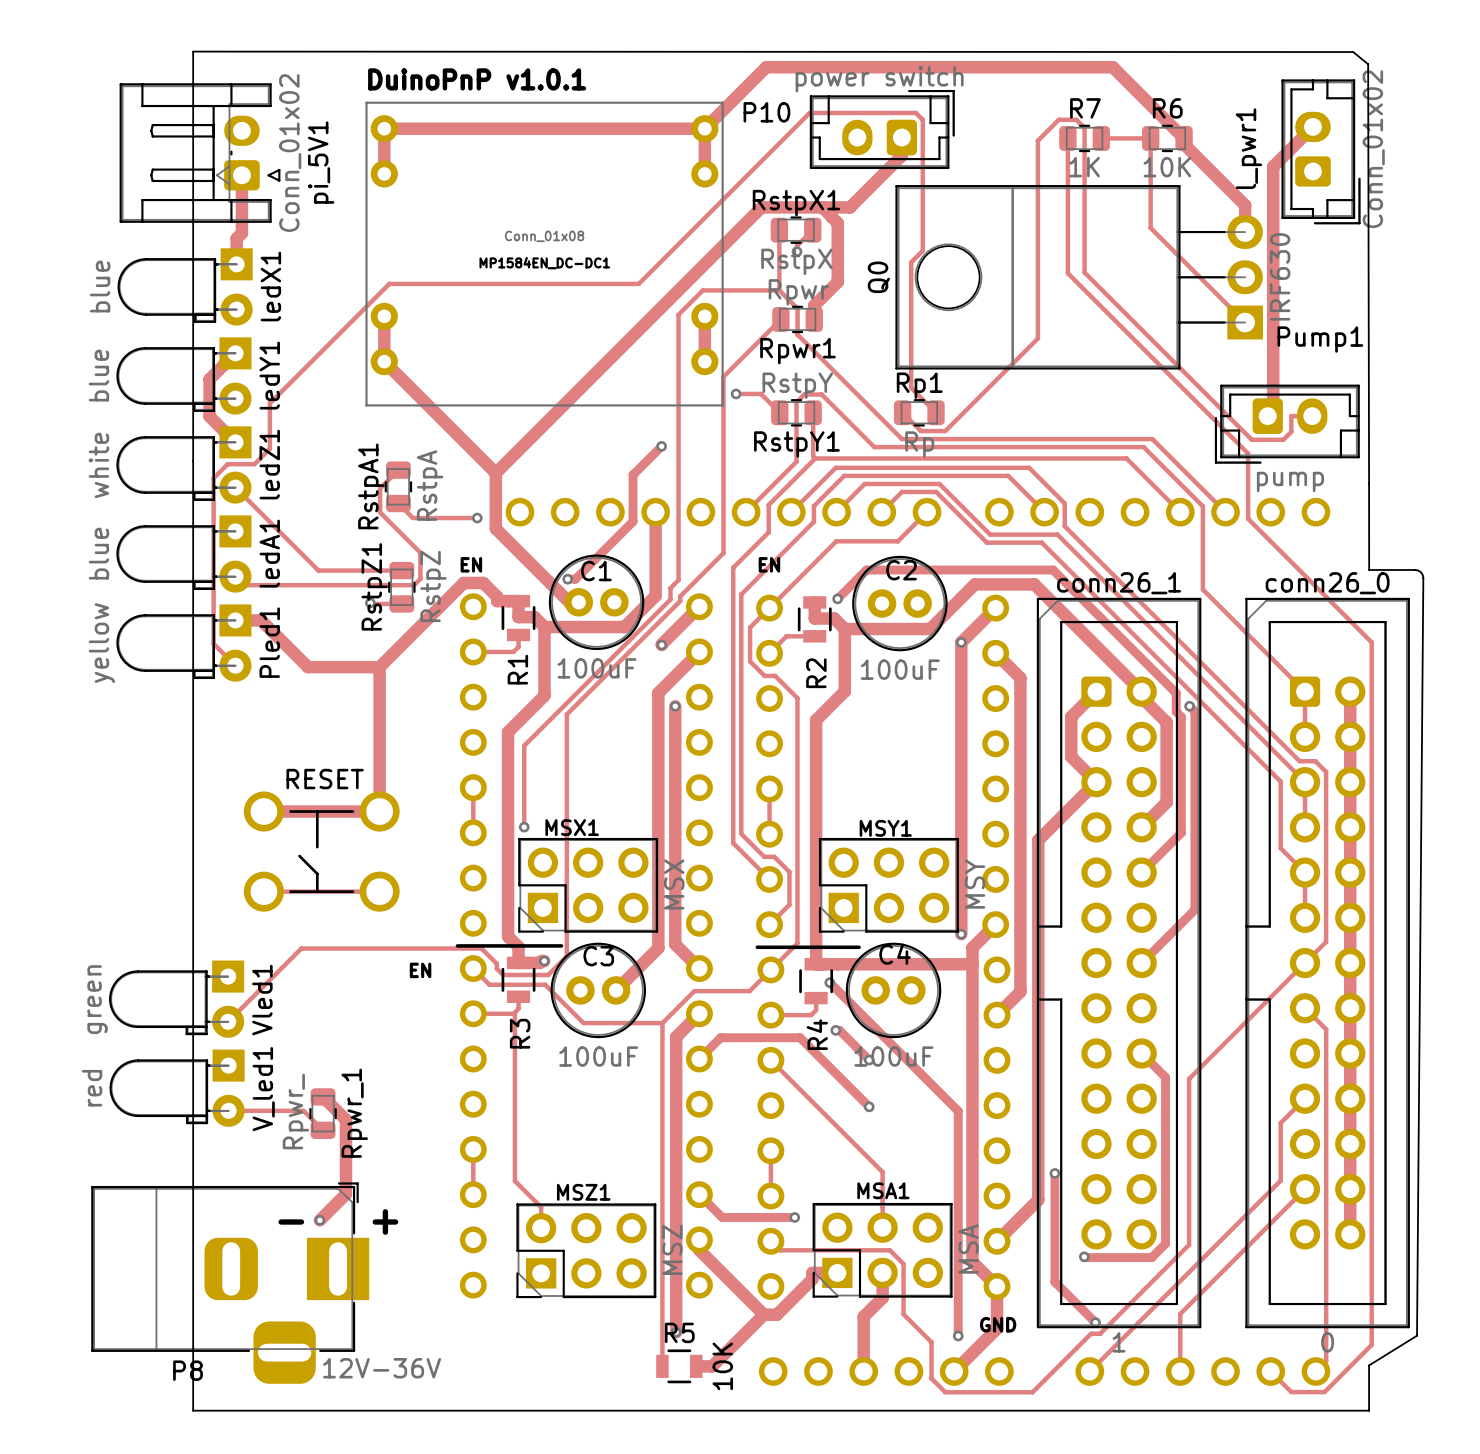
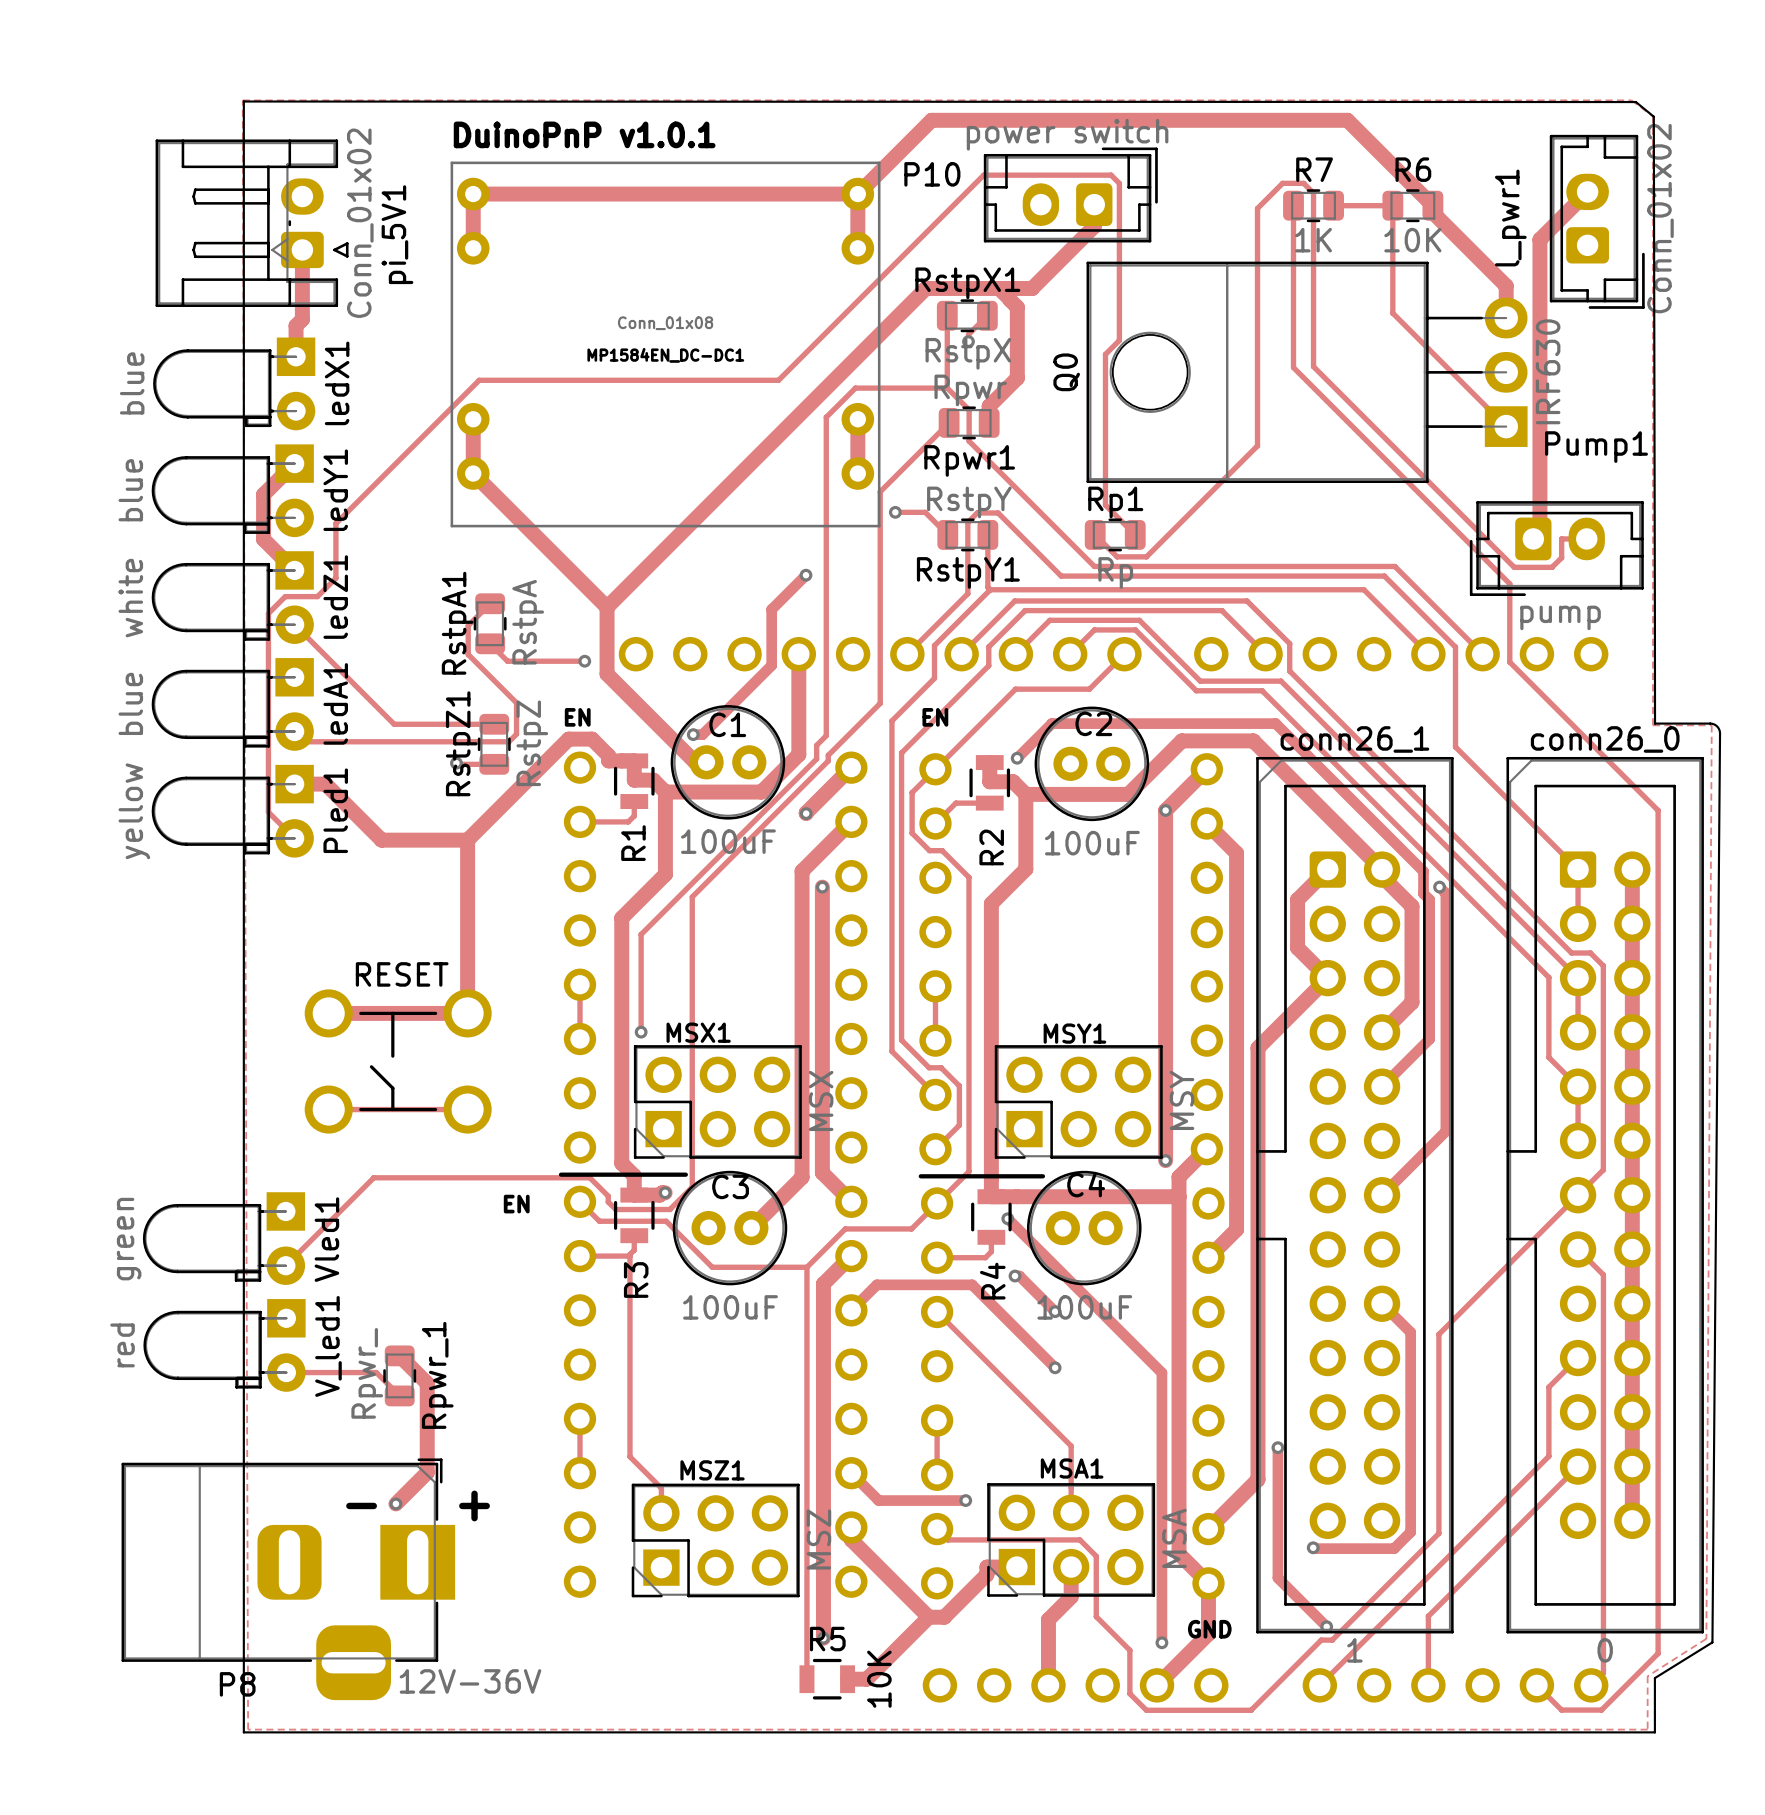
zone outline: none -> (242, 100) (248, 1729) (1647, 1729) (1647, 1676) (1706, 1638) (1711, 725) (1652, 725) (1652, 116) (1631, 100) (242, 100)

